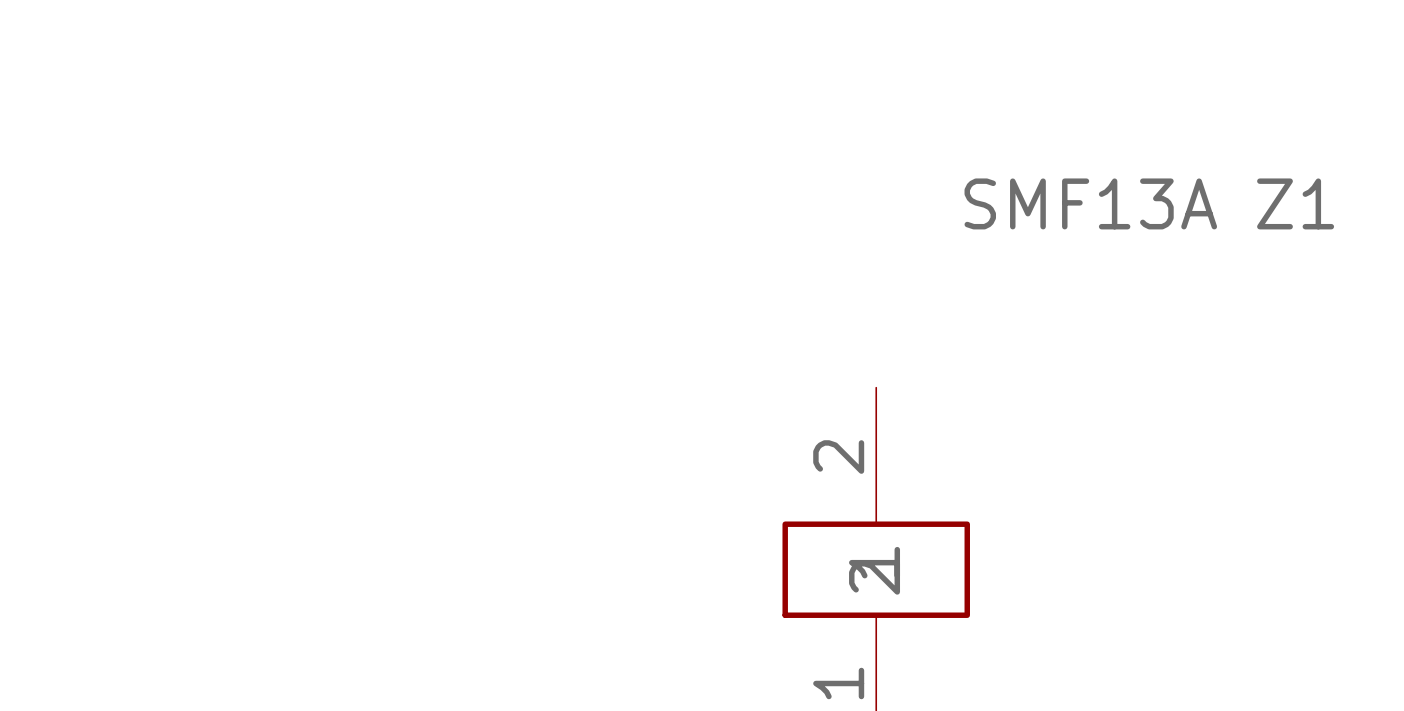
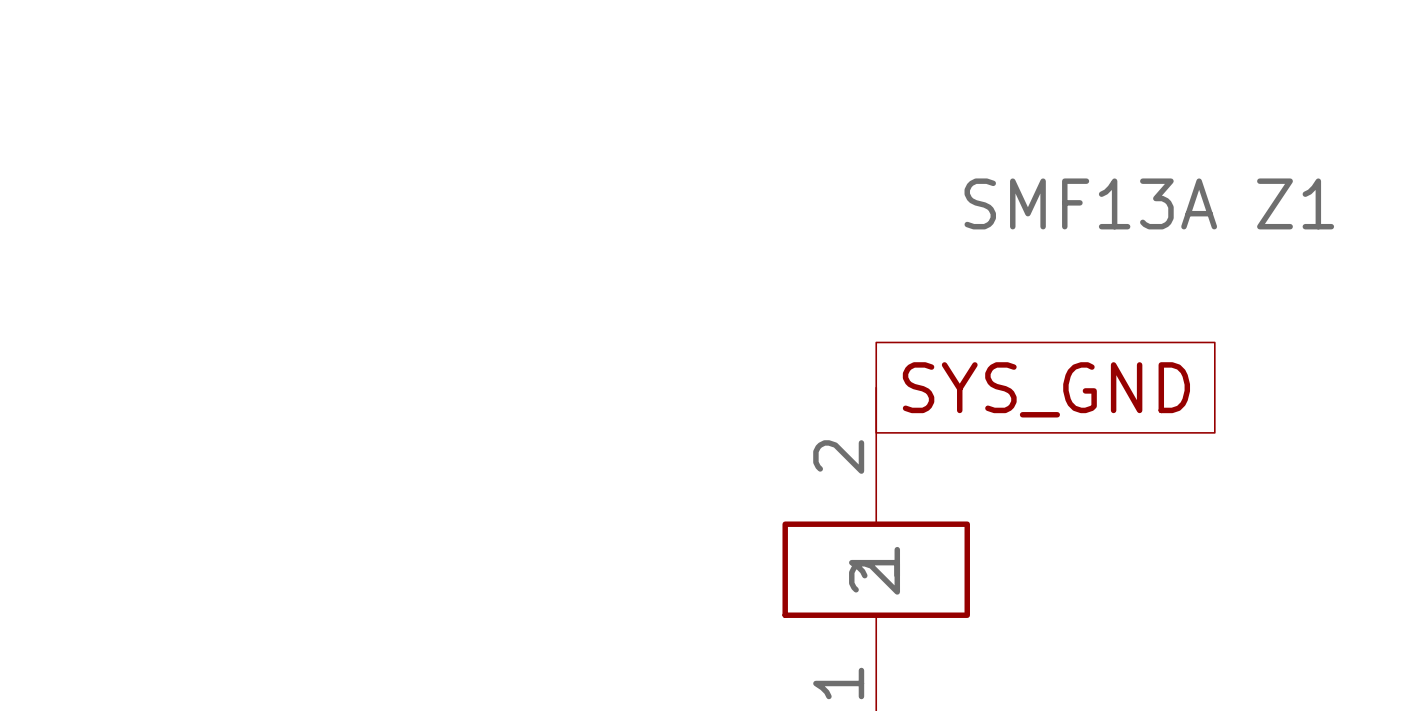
global label: none -> SYS_GND (1046, 389)

